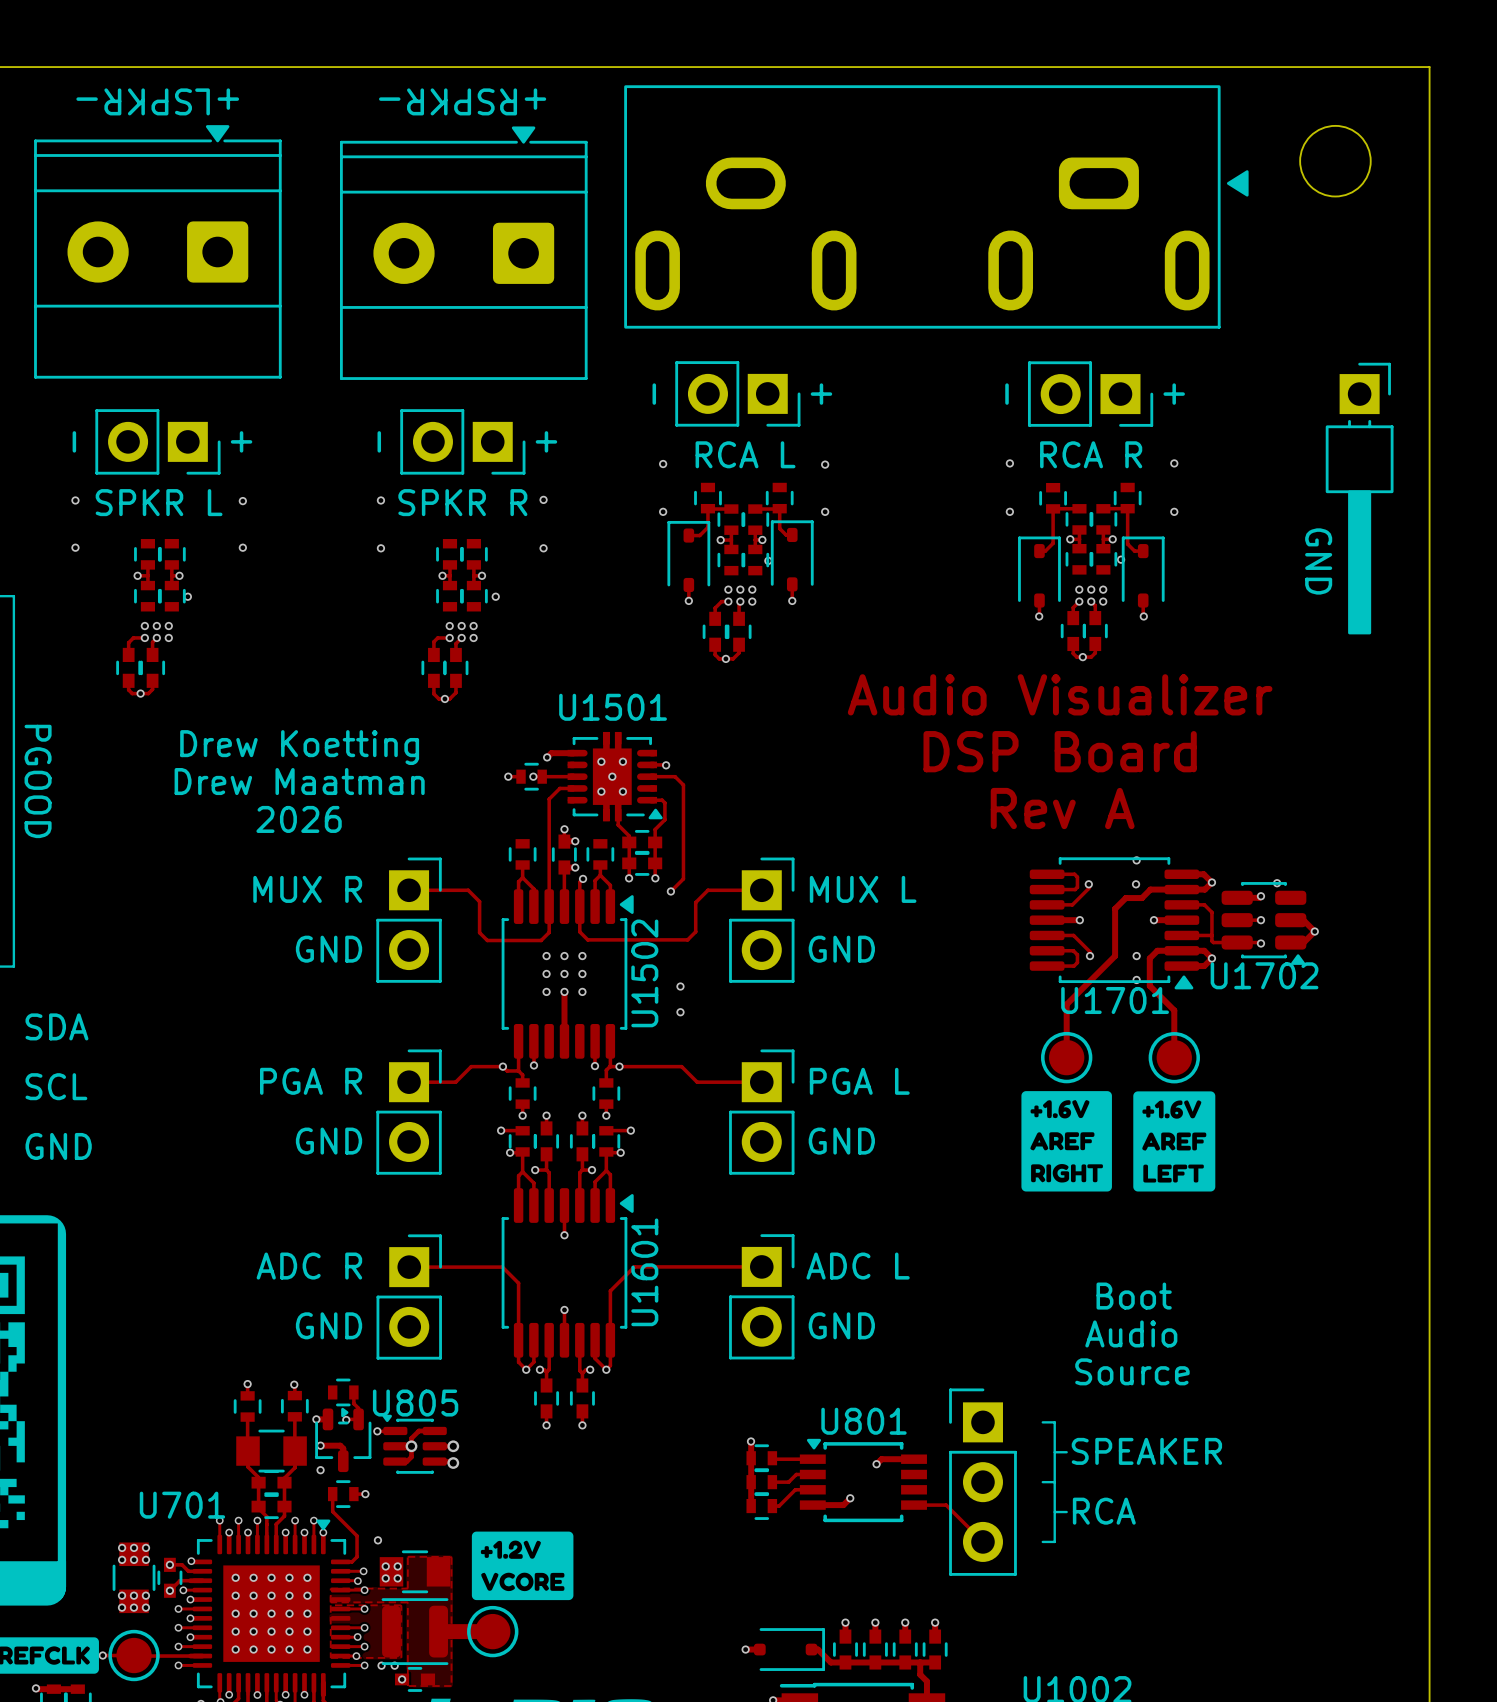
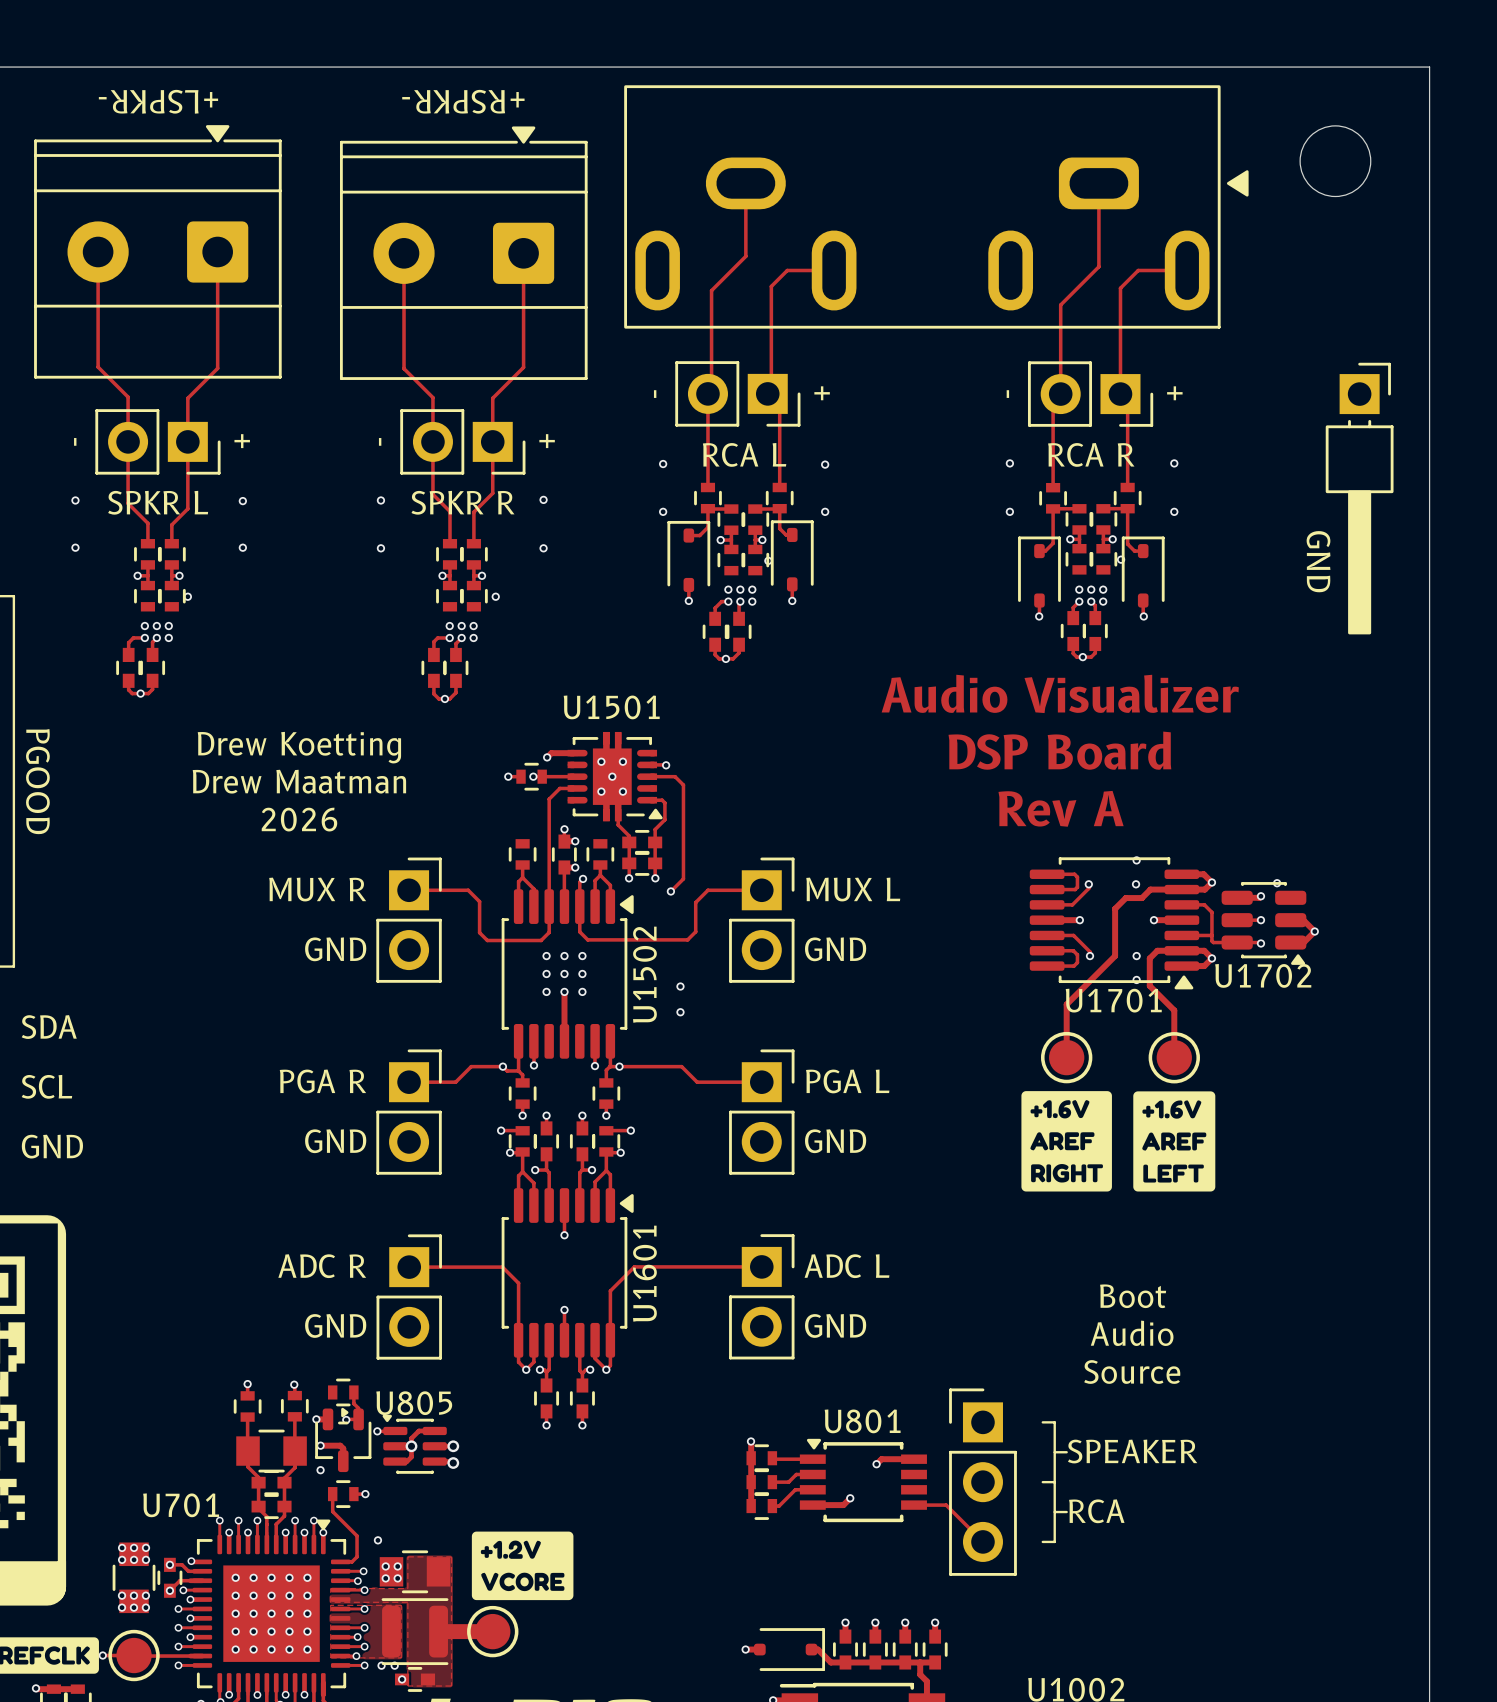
track: none -> (745, 183) (745, 256) (711, 290) (711, 393) (707, 397) (707, 487)
track: none -> (1098, 183) (1098, 266) (1060, 304) (1060, 394) (1053, 401) (1053, 487)
track: none -> (98, 251) (98, 367) (128, 397) (128, 503) (147, 523) (147, 543)
track: none -> (217, 251) (217, 368) (187, 398) (187, 508) (171, 524) (171, 543)
track: none -> (404, 253) (404, 368) (432, 397) (432, 494) (449, 511) (449, 543)
track: none -> (523, 253) (523, 367) (492, 398) (492, 493) (473, 512) (473, 543)
track: none -> (834, 270) (787, 270) (771, 286) (771, 393) (779, 402) (779, 487)
track: none -> (1187, 270) (1138, 270) (1120, 288) (1120, 394) (1127, 401) (1127, 487)

